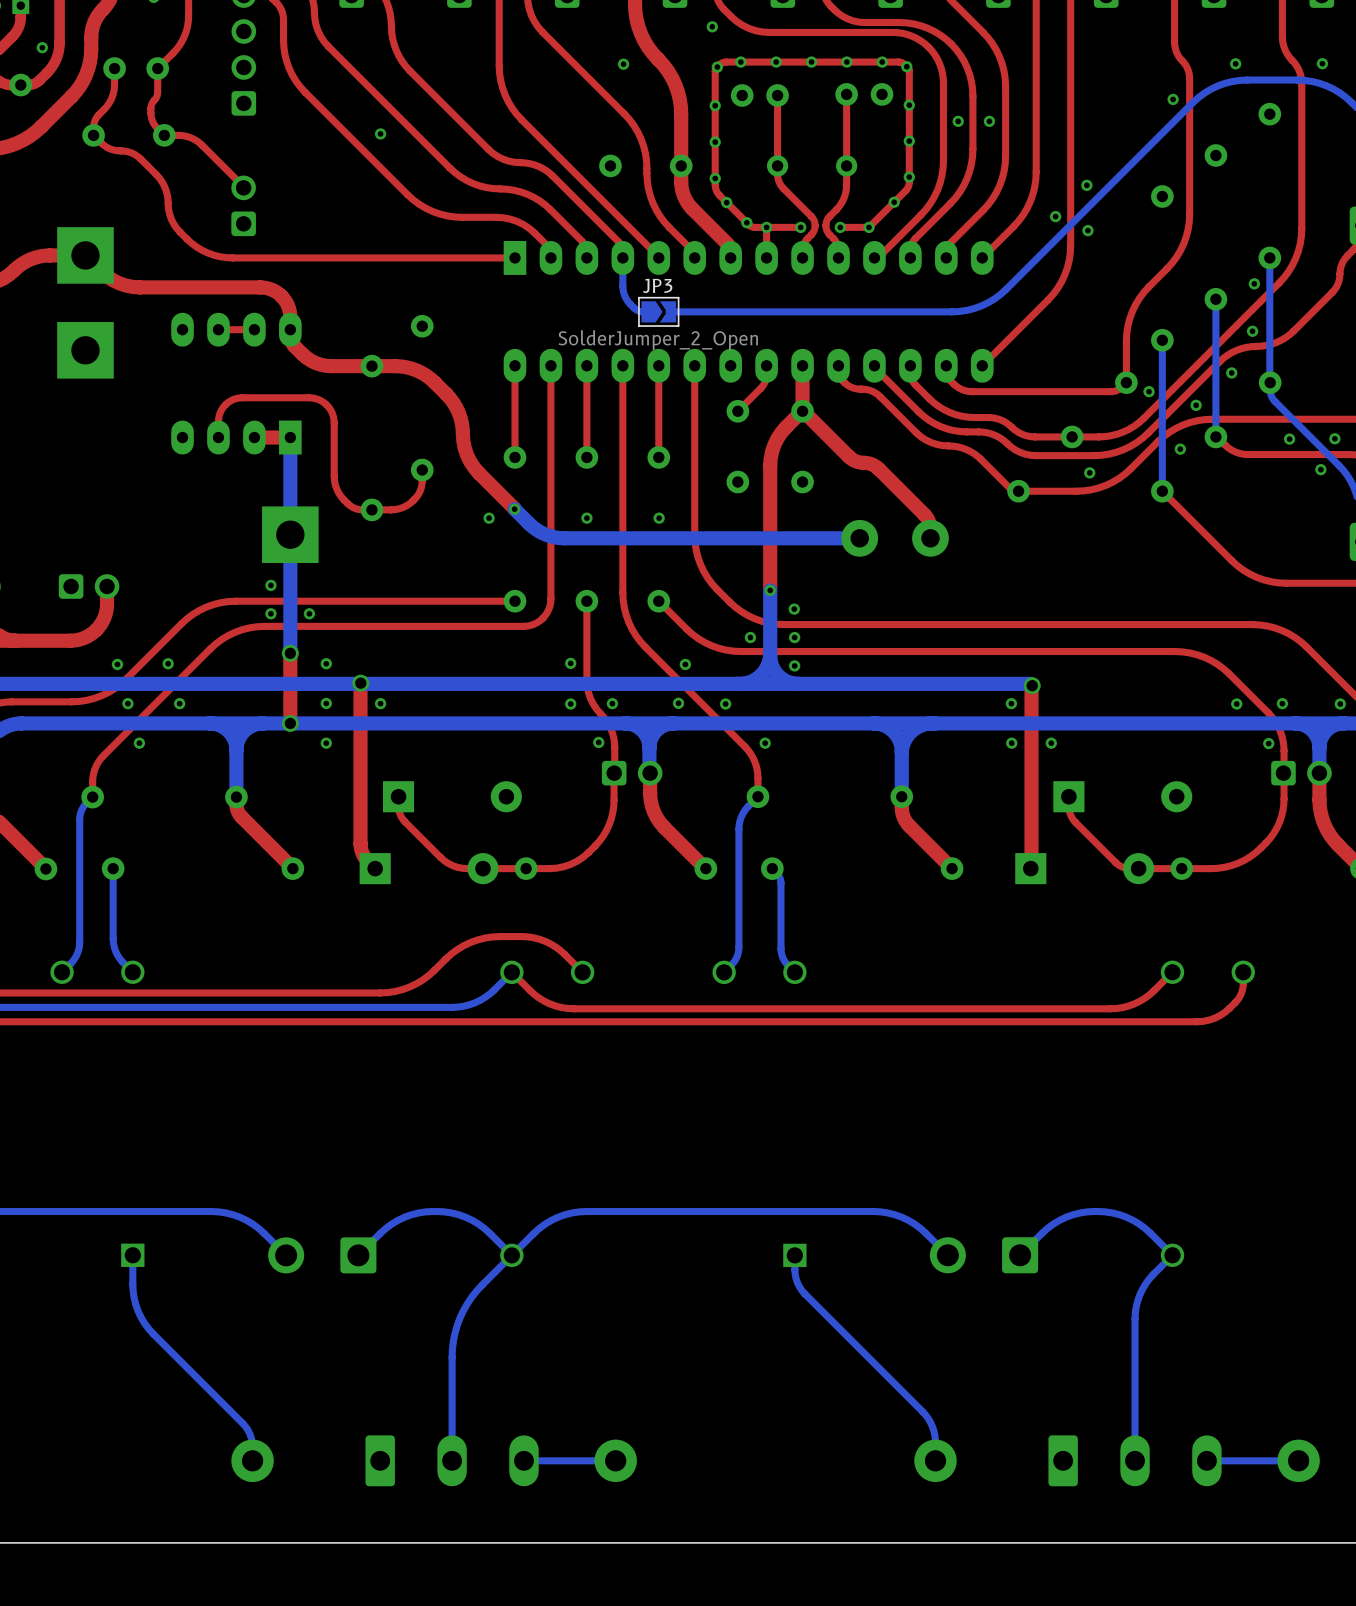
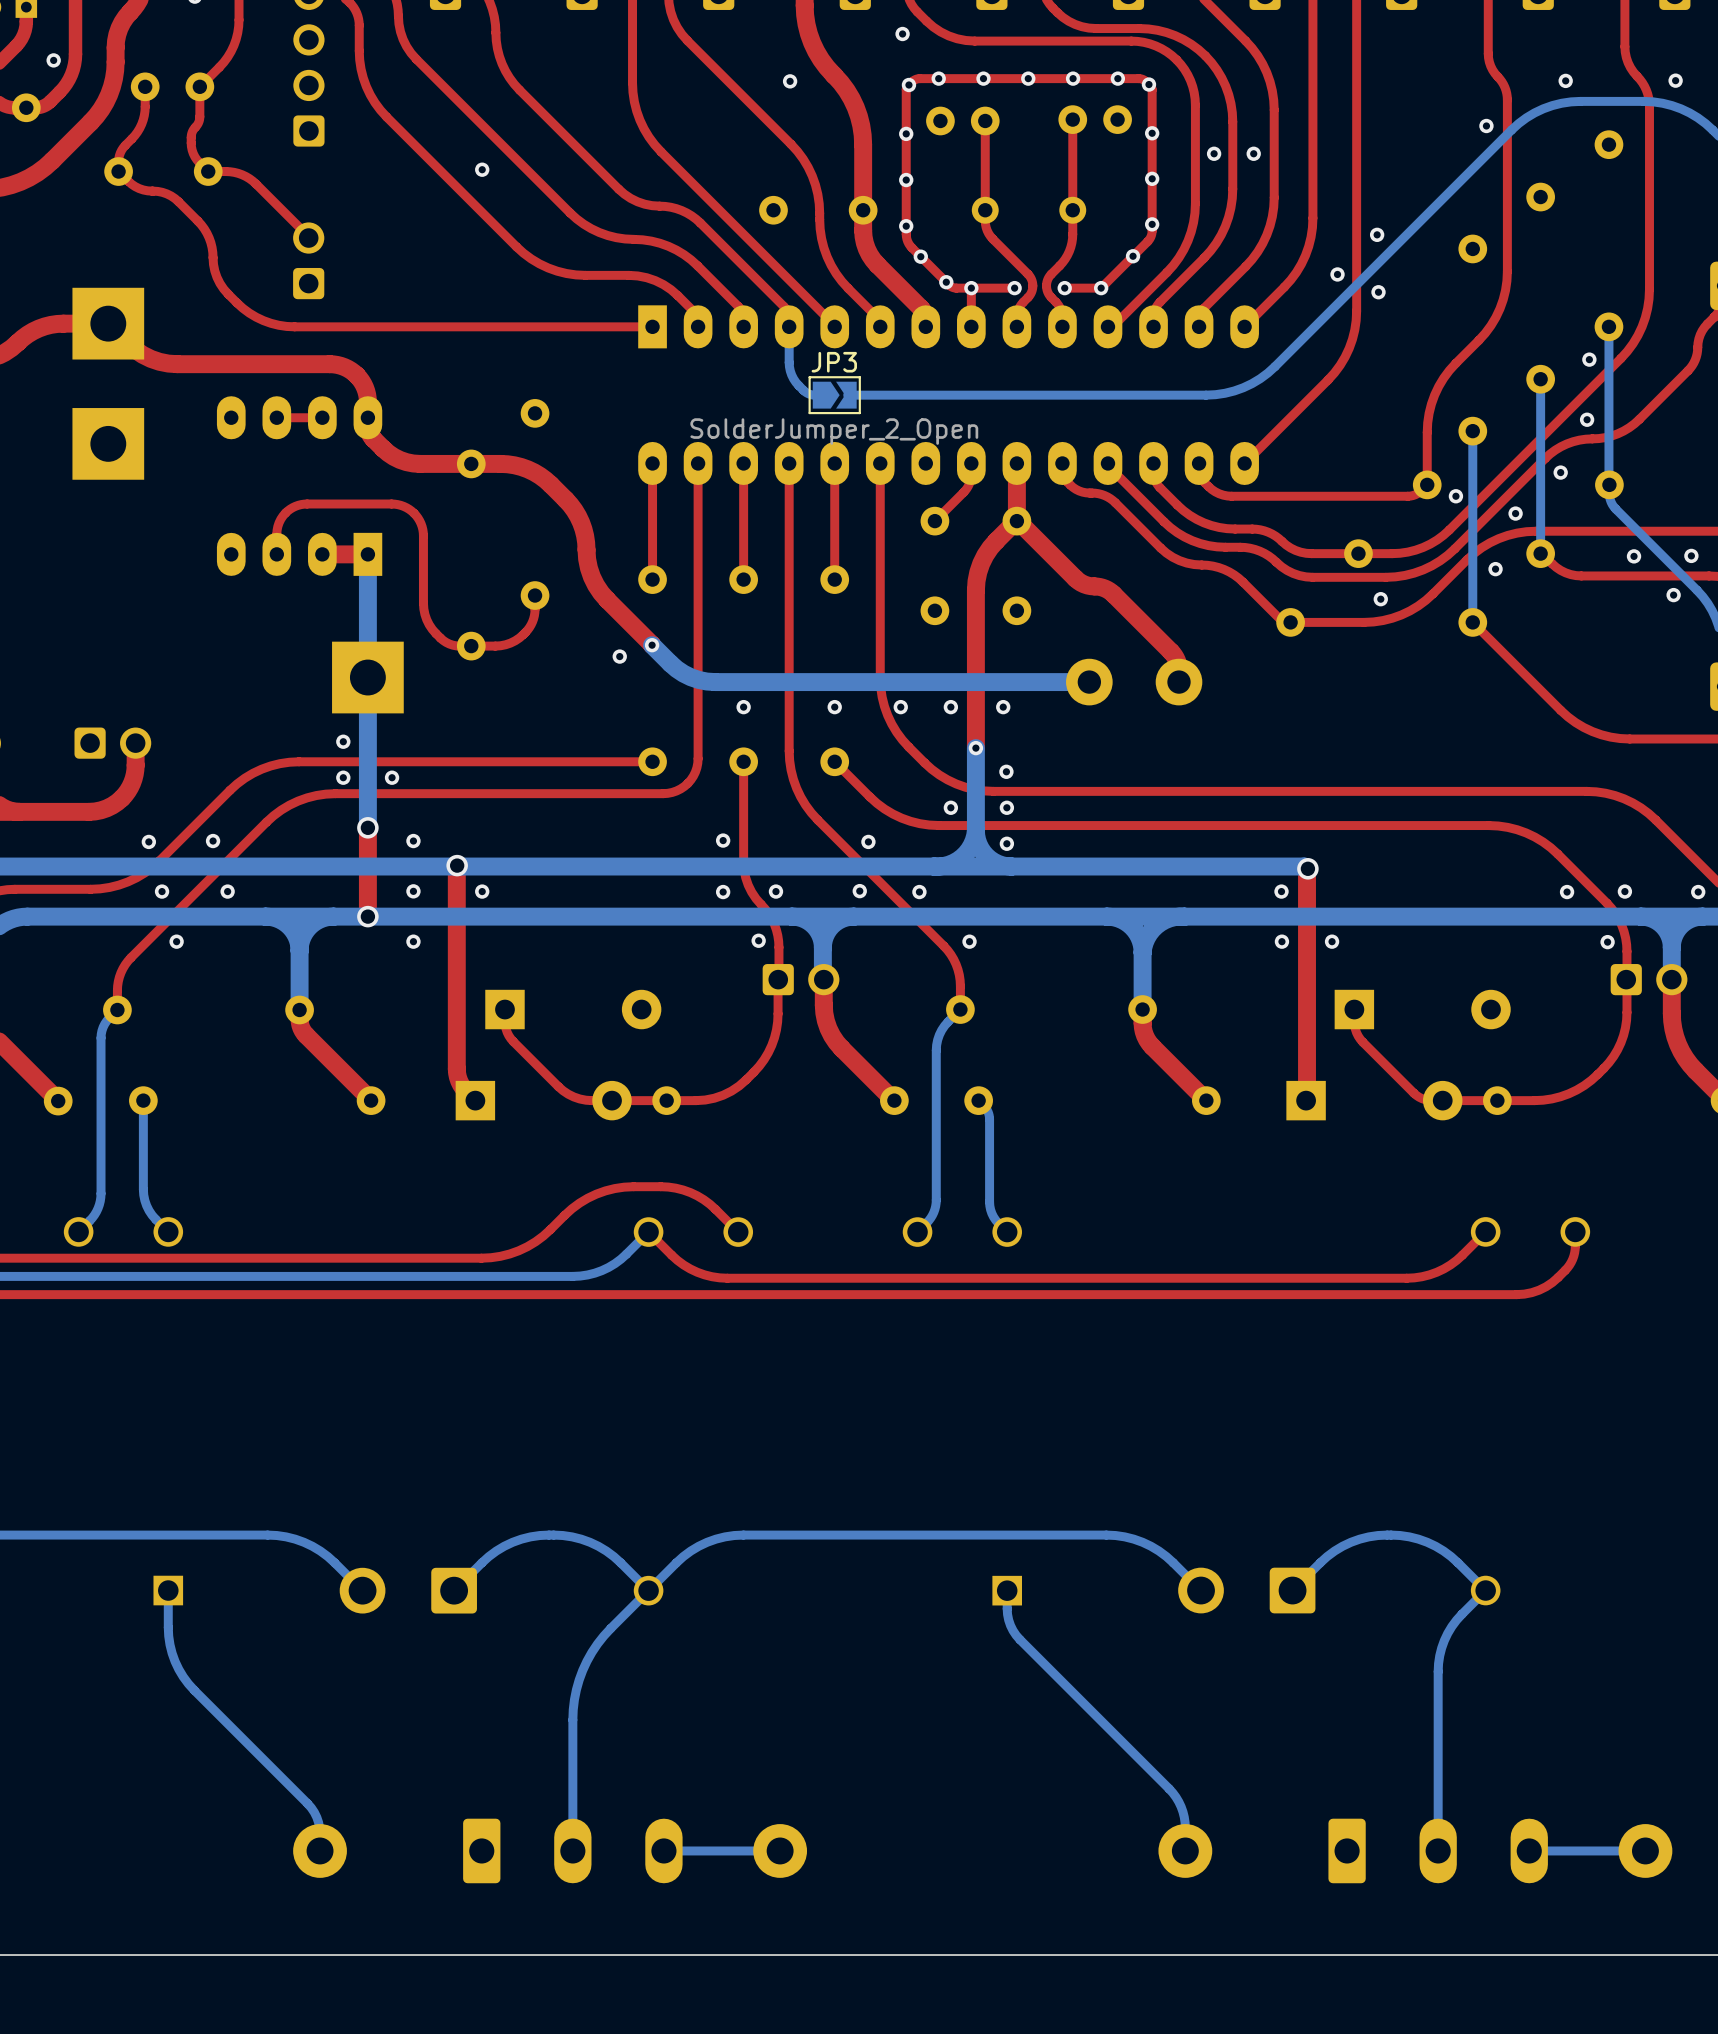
via position: (586, 518) -> (743, 707)
via: (659, 518) -> none
via: none -> (834, 707)
via: none -> (900, 707)
via: none -> (950, 707)
via: none -> (1003, 707)

